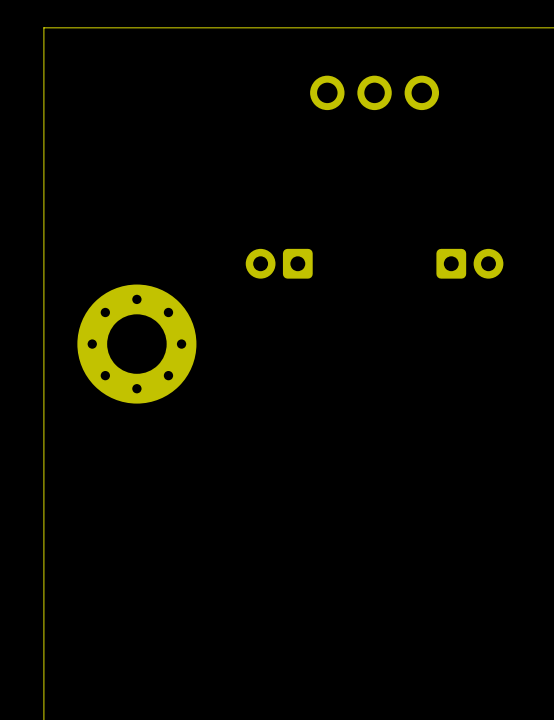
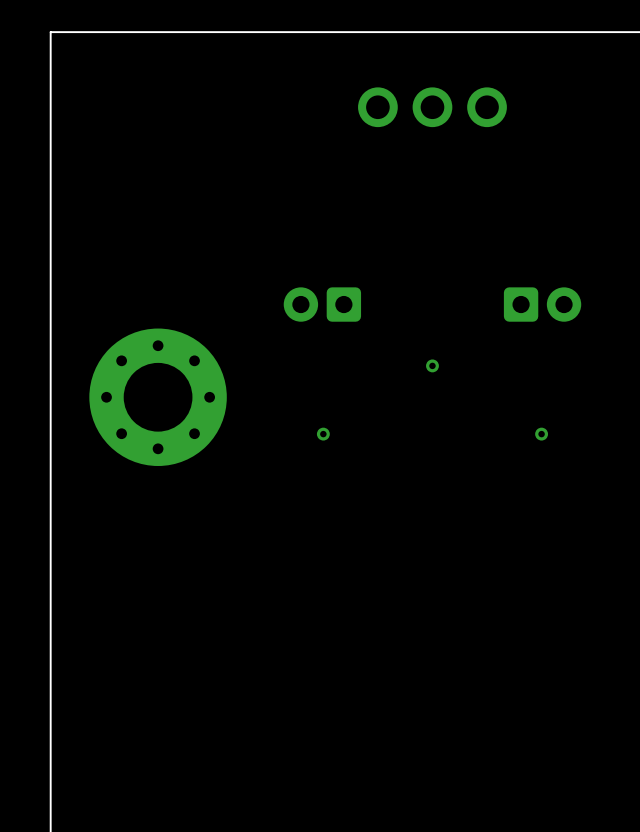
via: none -> (432, 365)
via: none -> (323, 434)
via: none -> (541, 434)

